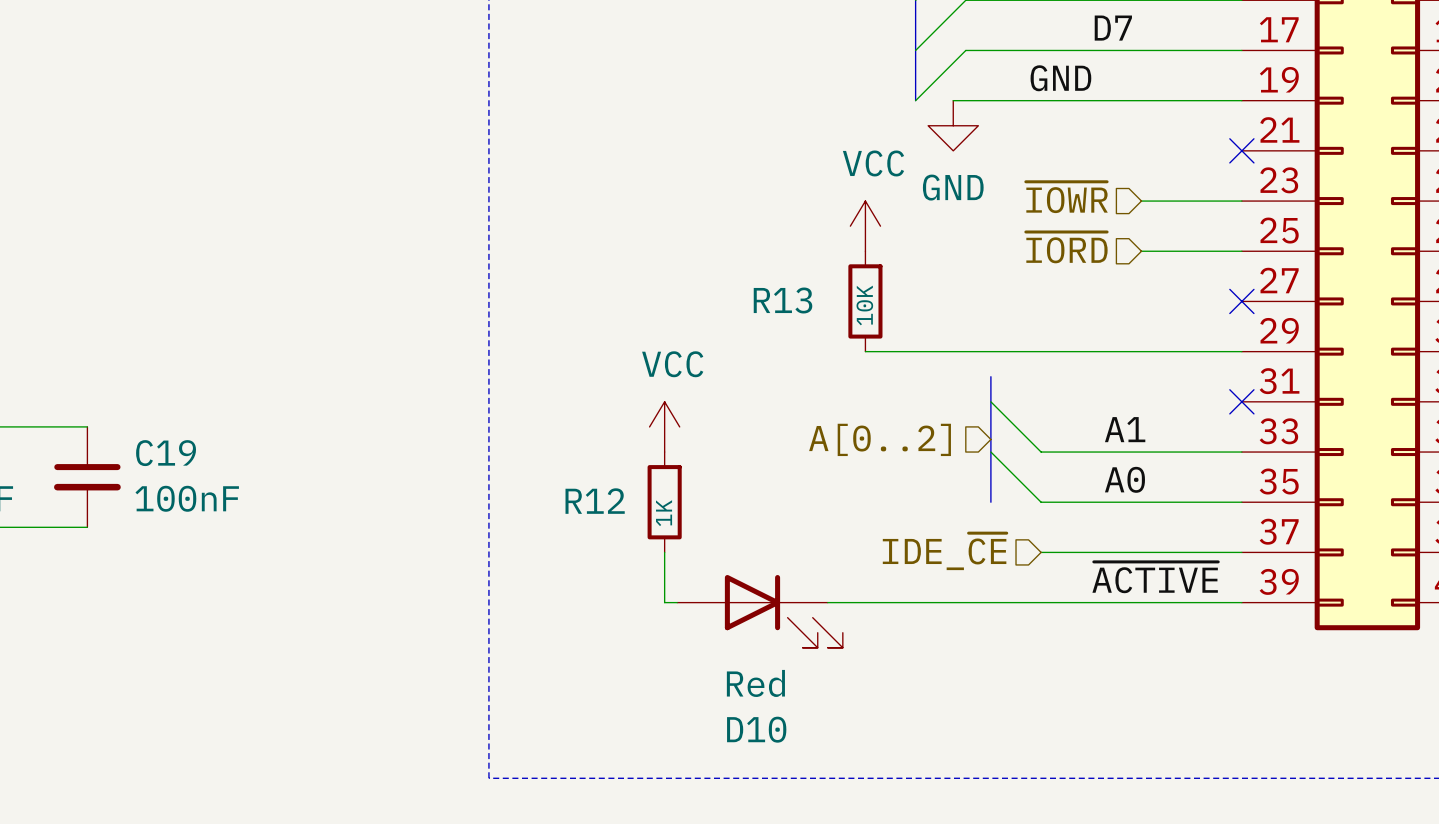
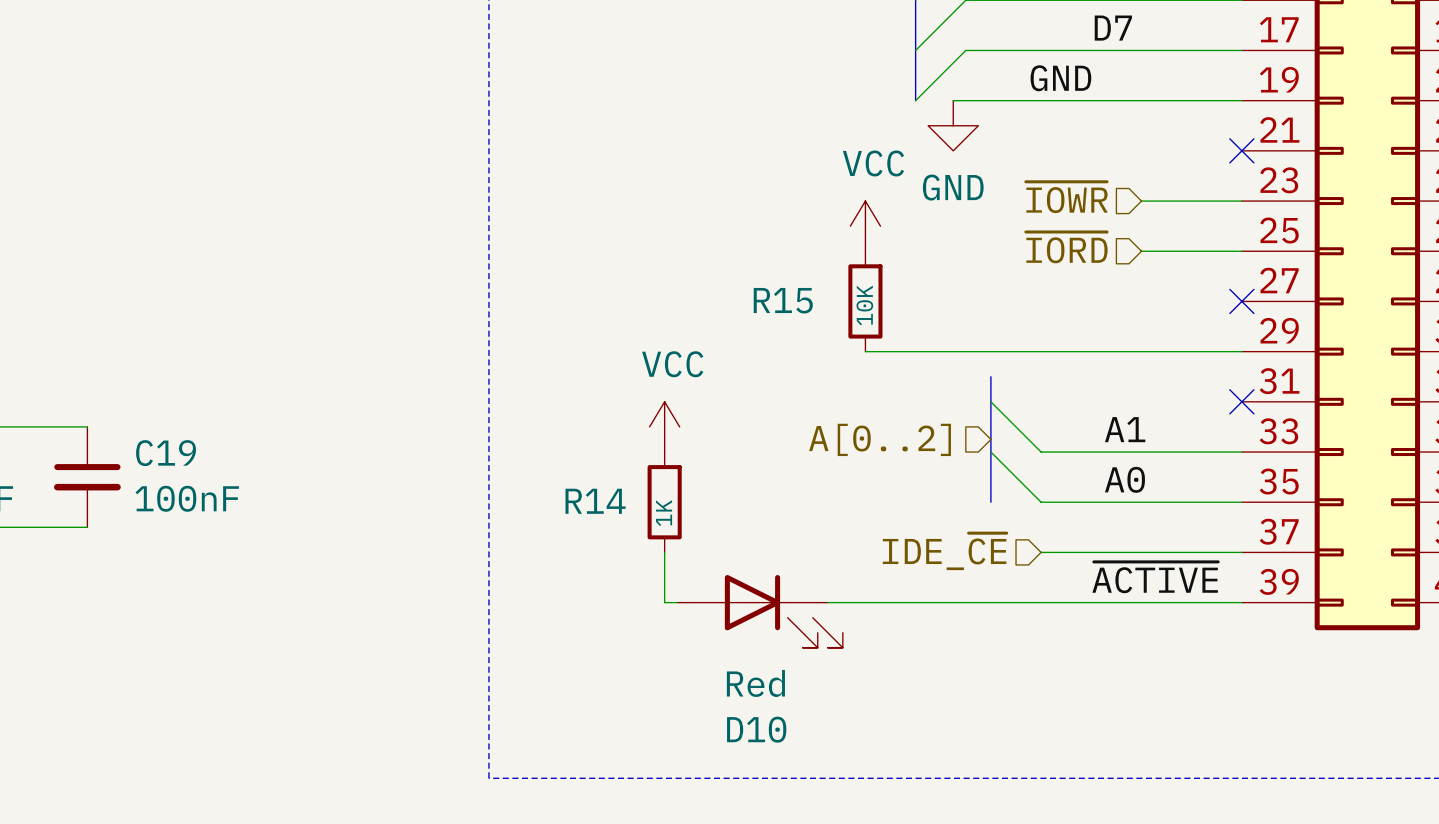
R13 name: R13 (783, 300) -> R15 (783, 300)
R12 name: R12 (595, 501) -> R14 (595, 501)

